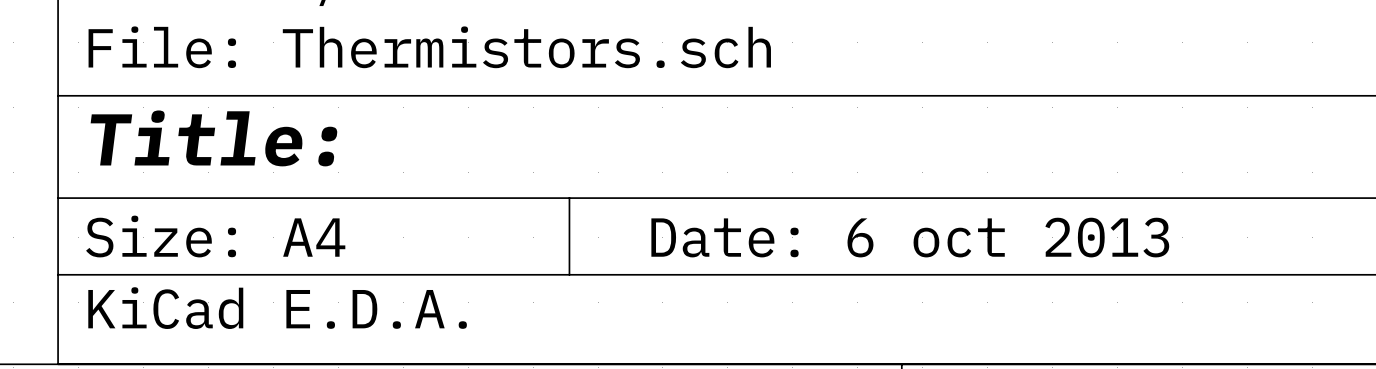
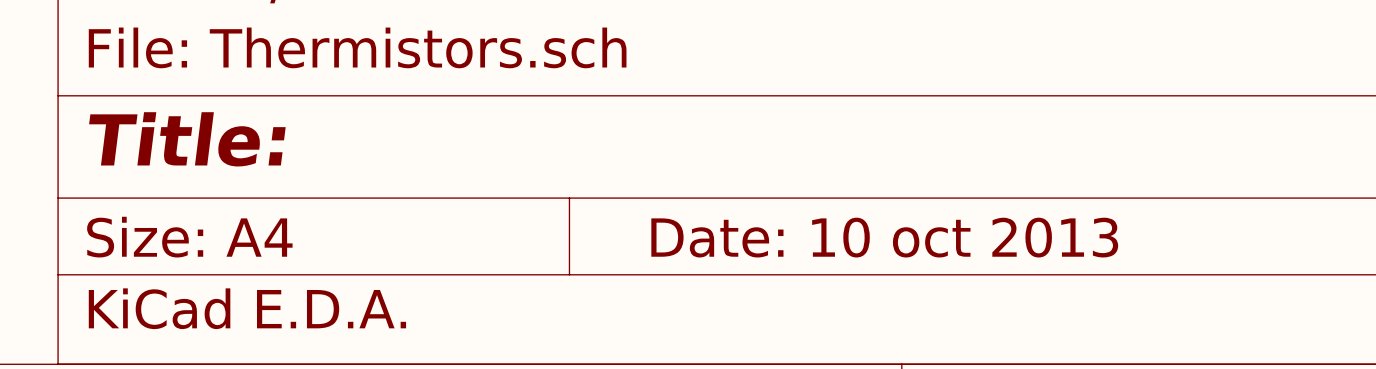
title block: Date: 6 oct 2013 (910, 237) -> Date: 10 oct 2013 (884, 237)

